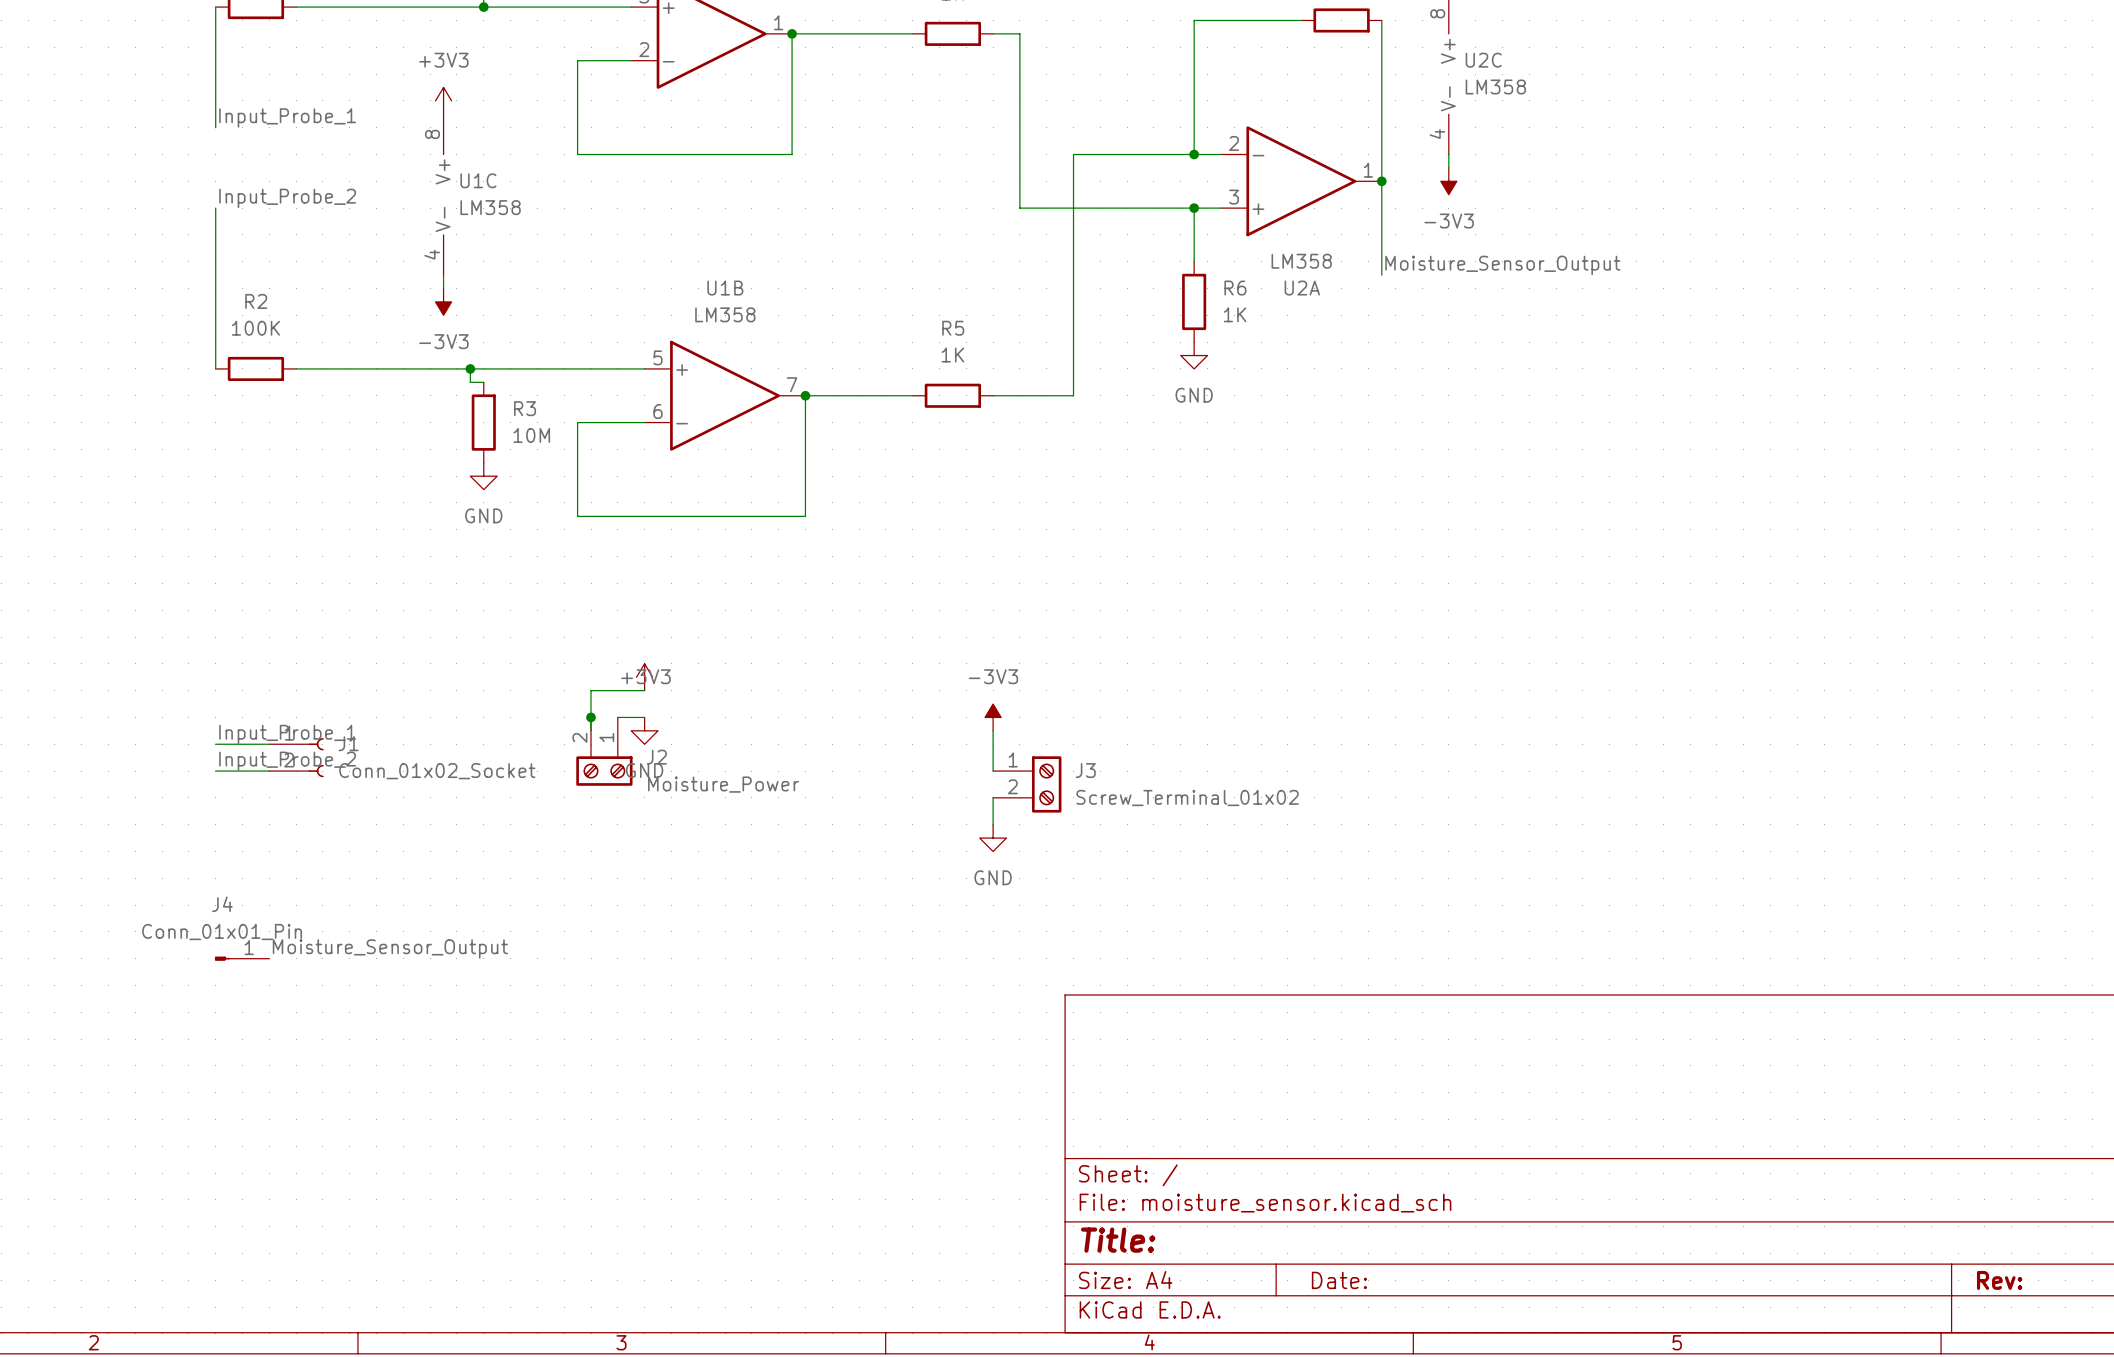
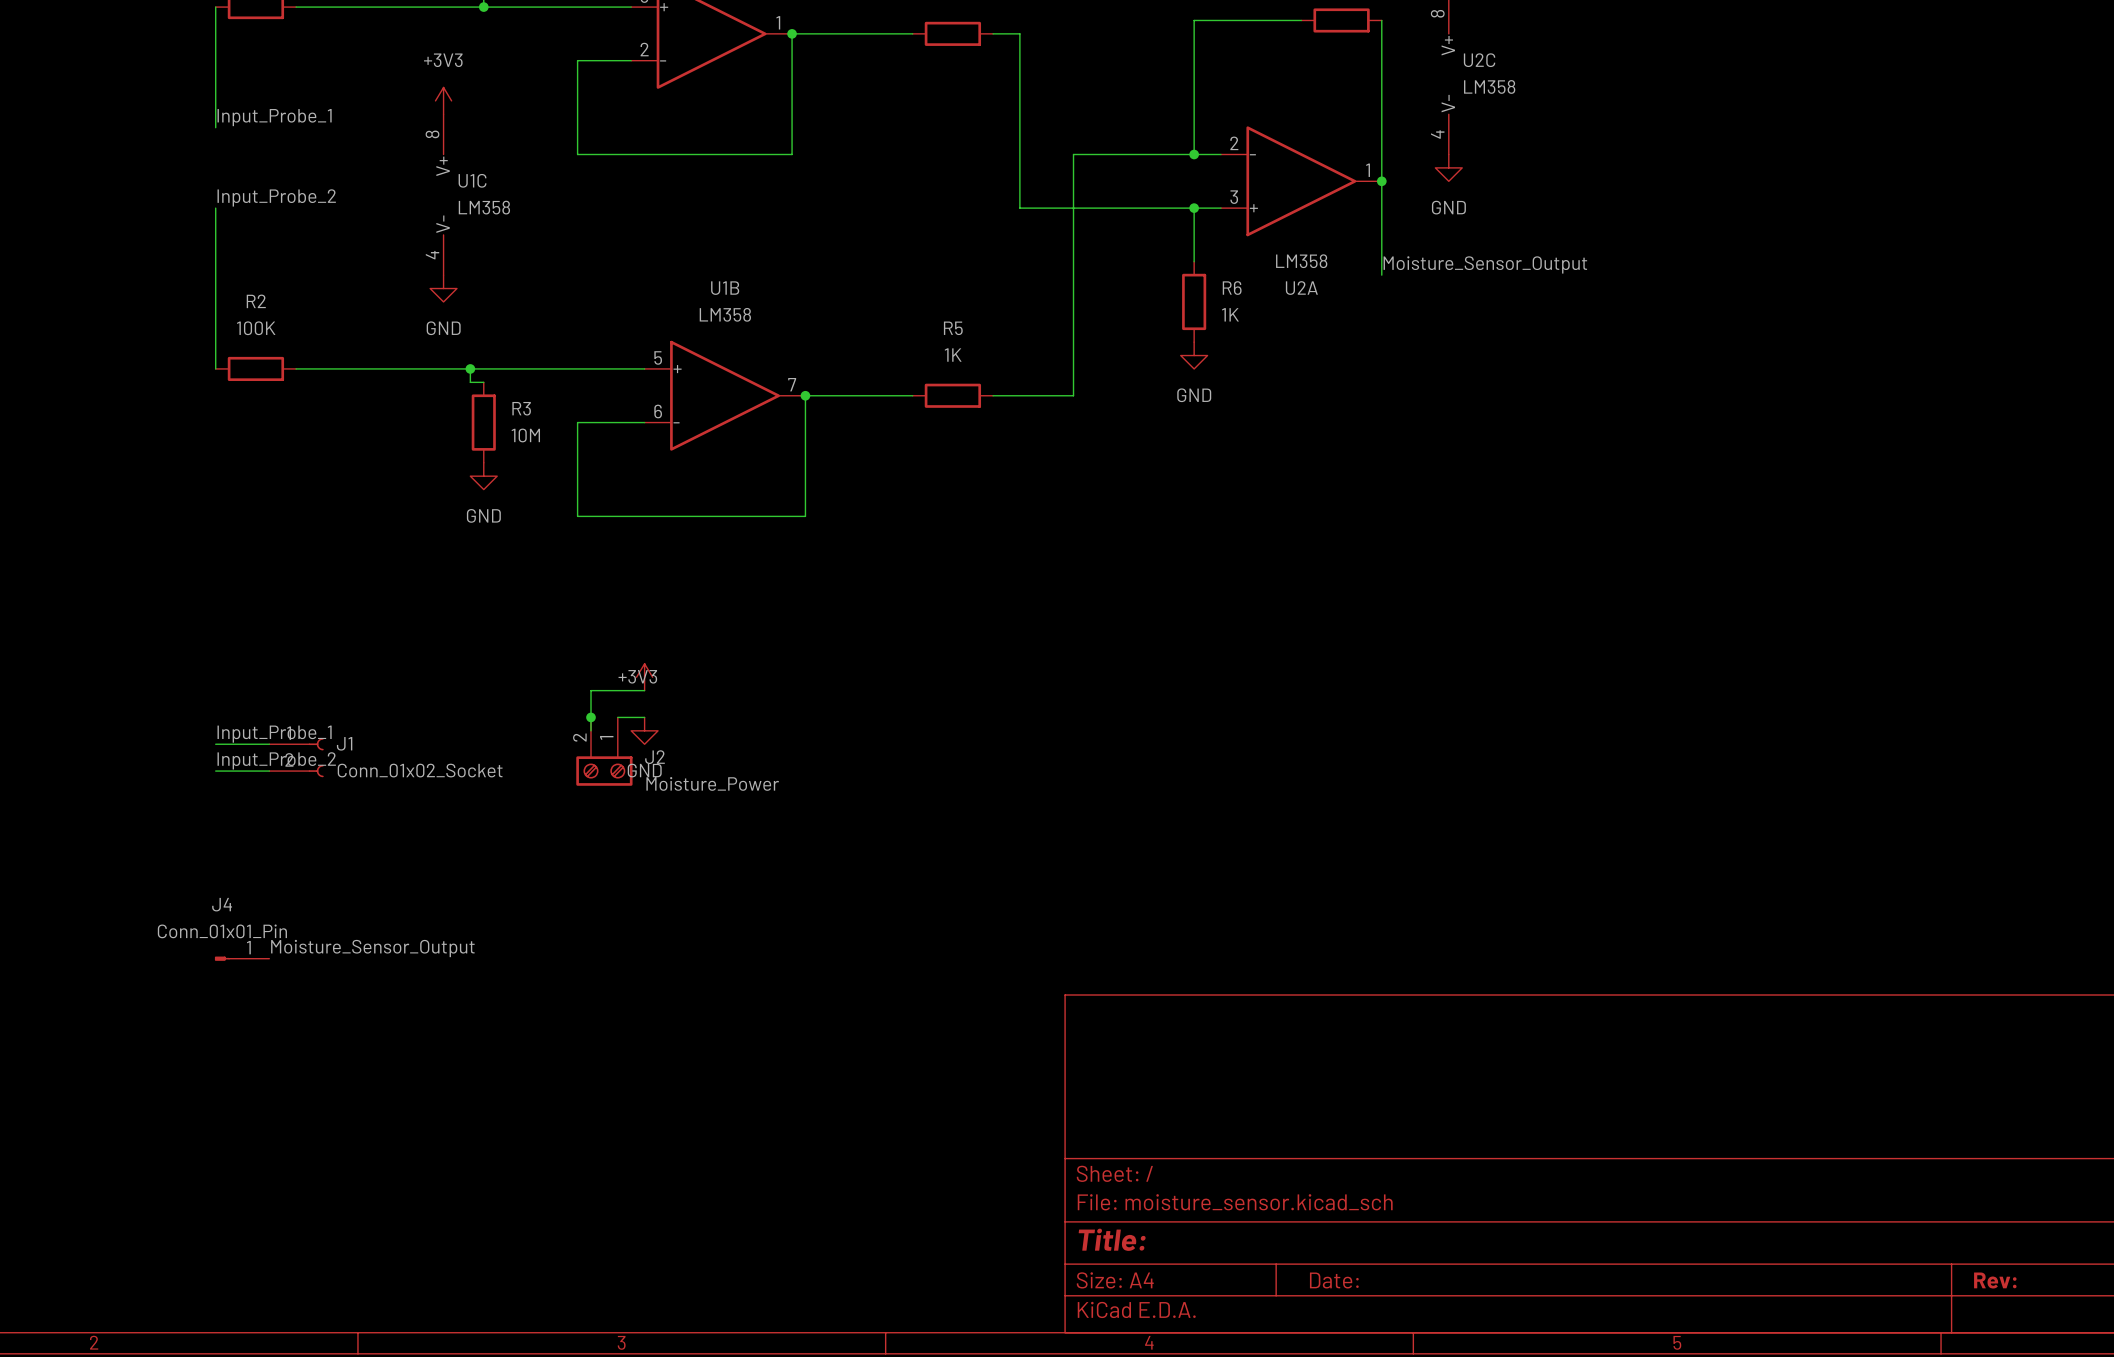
power symbol: none -> GND (1448, 167)
power symbol: -3V3 (1448, 181) -> none
power symbol: none -> GND (443, 288)
power symbol: -3V3 (443, 301) -> none
power symbol: -3V3 (993, 717) -> none
wire: (993, 730) (993, 771) -> none
J3: Screw_Terminal_01x02 (1027, 784) -> none
wire: (993, 797) (993, 824) -> none
power symbol: GND (993, 838) -> none

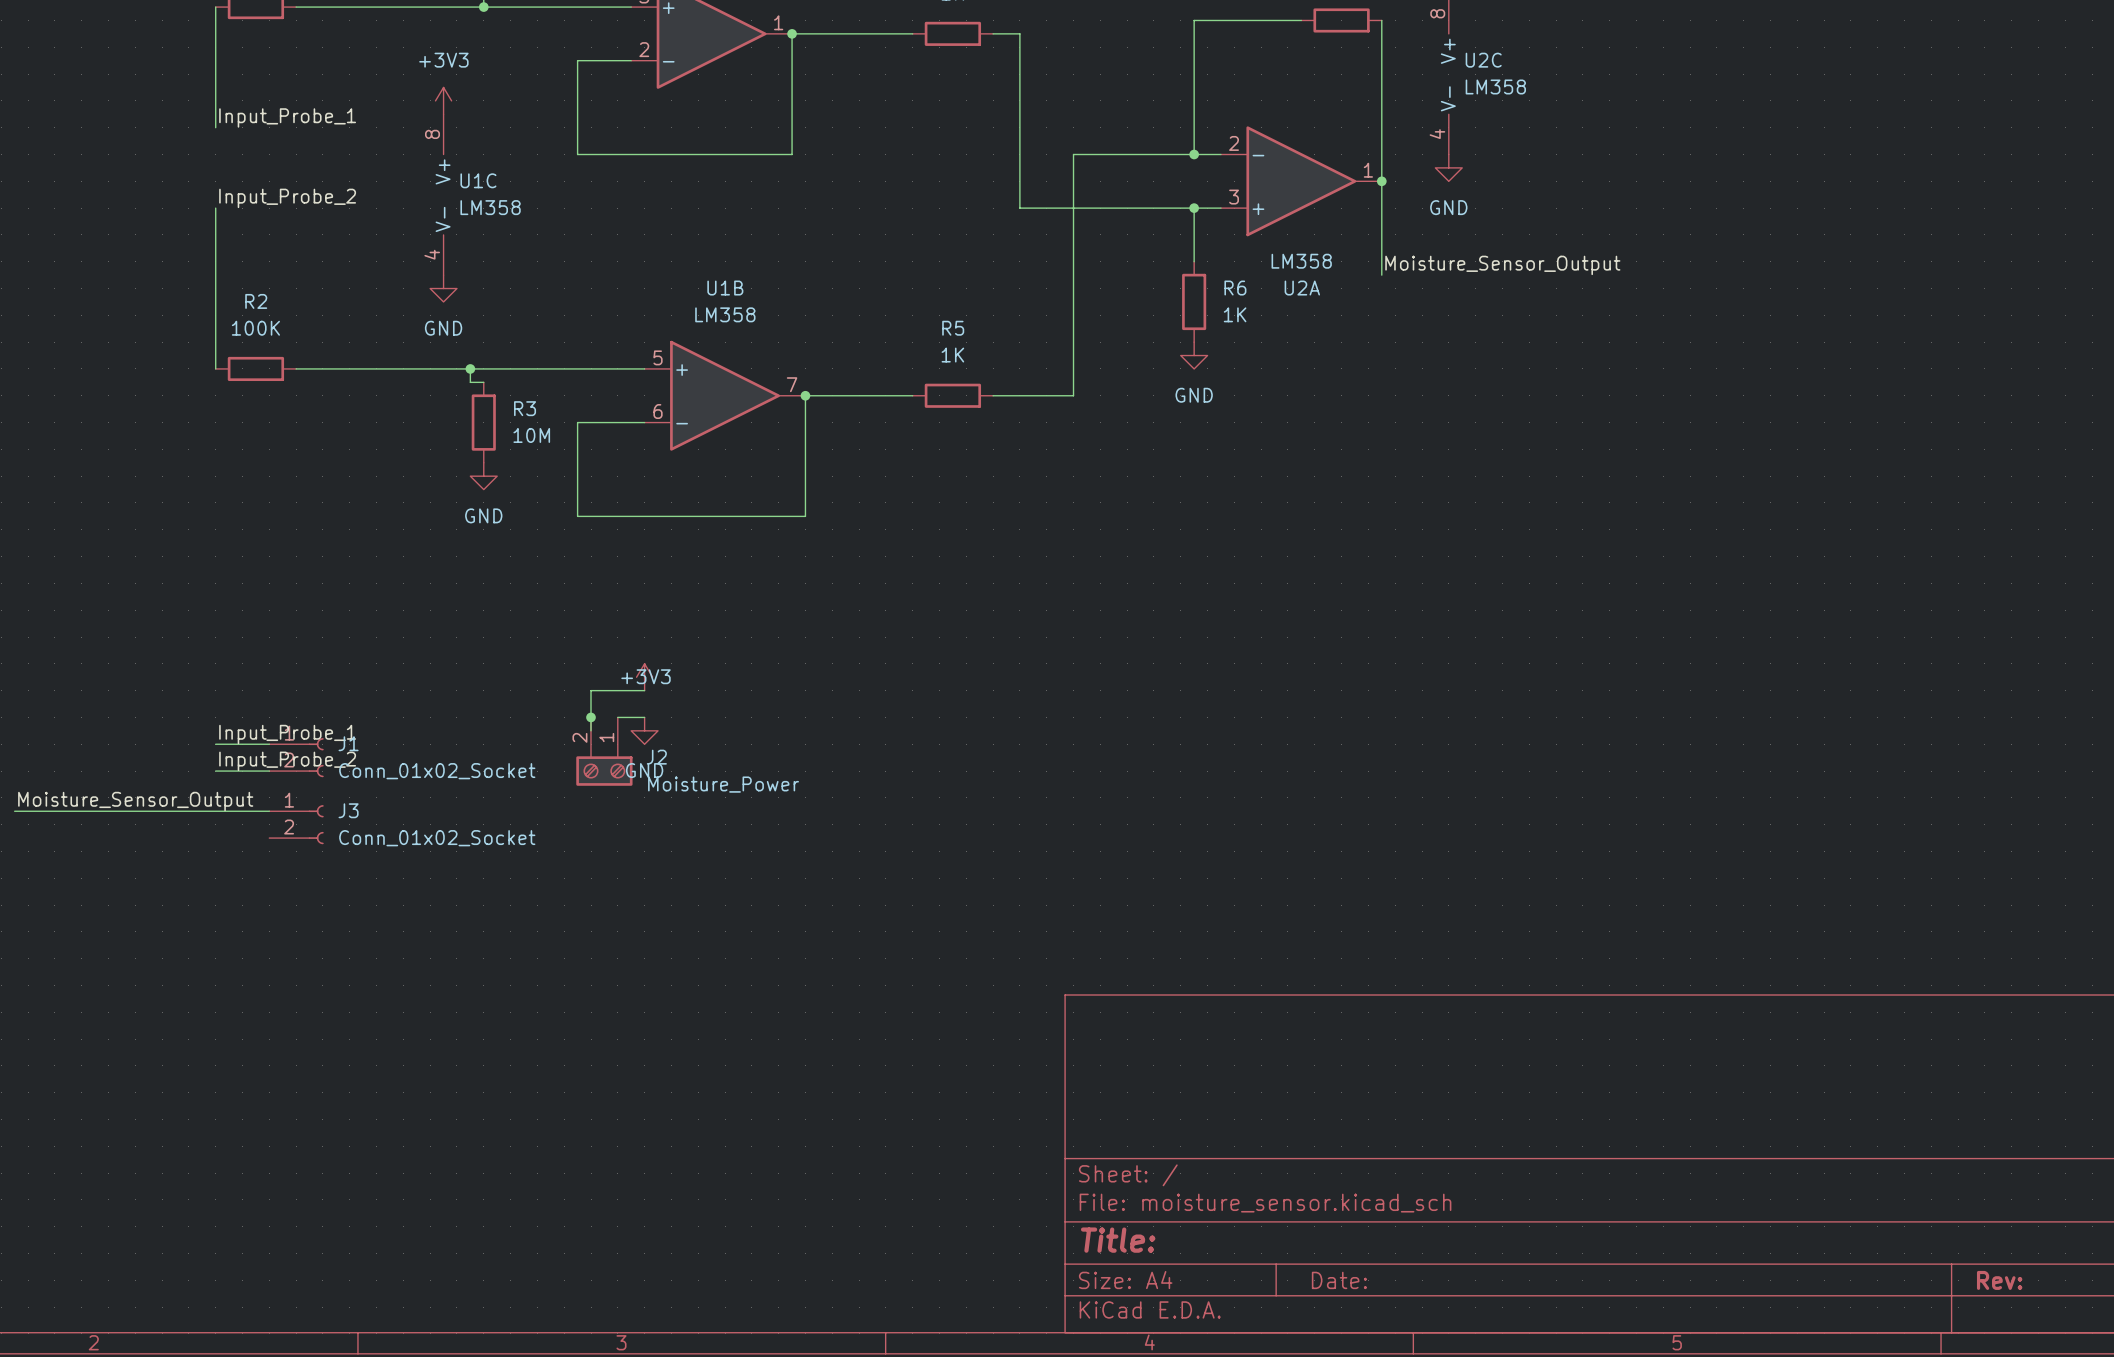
label: none -> Moisture_Sensor_Output (135, 801)
wire: none -> (14, 811) (269, 811)
J3: none -> Conn_01x02_Socket (296, 824)
label: Moisture_Sensor_Output (372, 948) -> none
J4: Conn_01x01_Pin (242, 958) -> none

